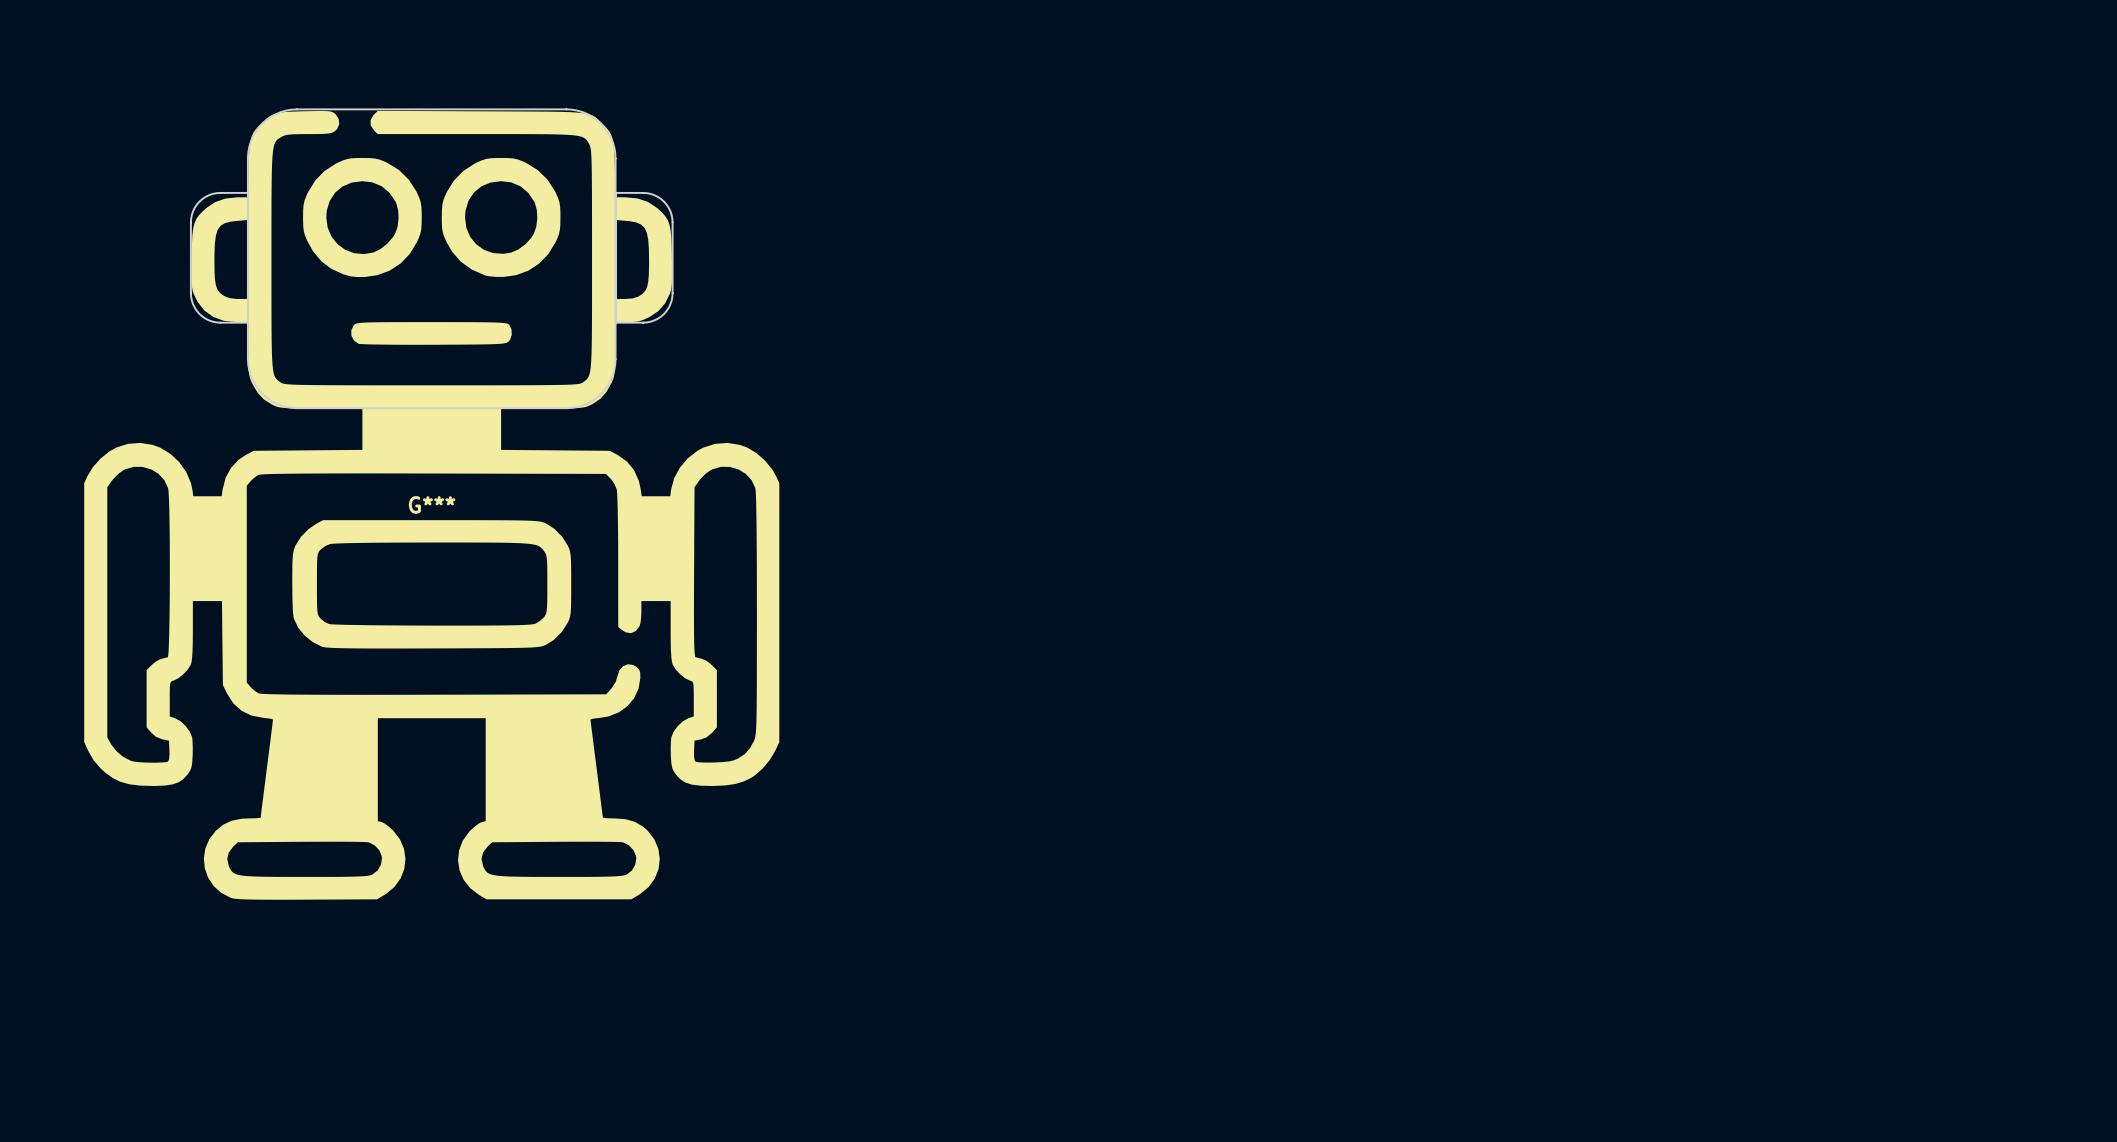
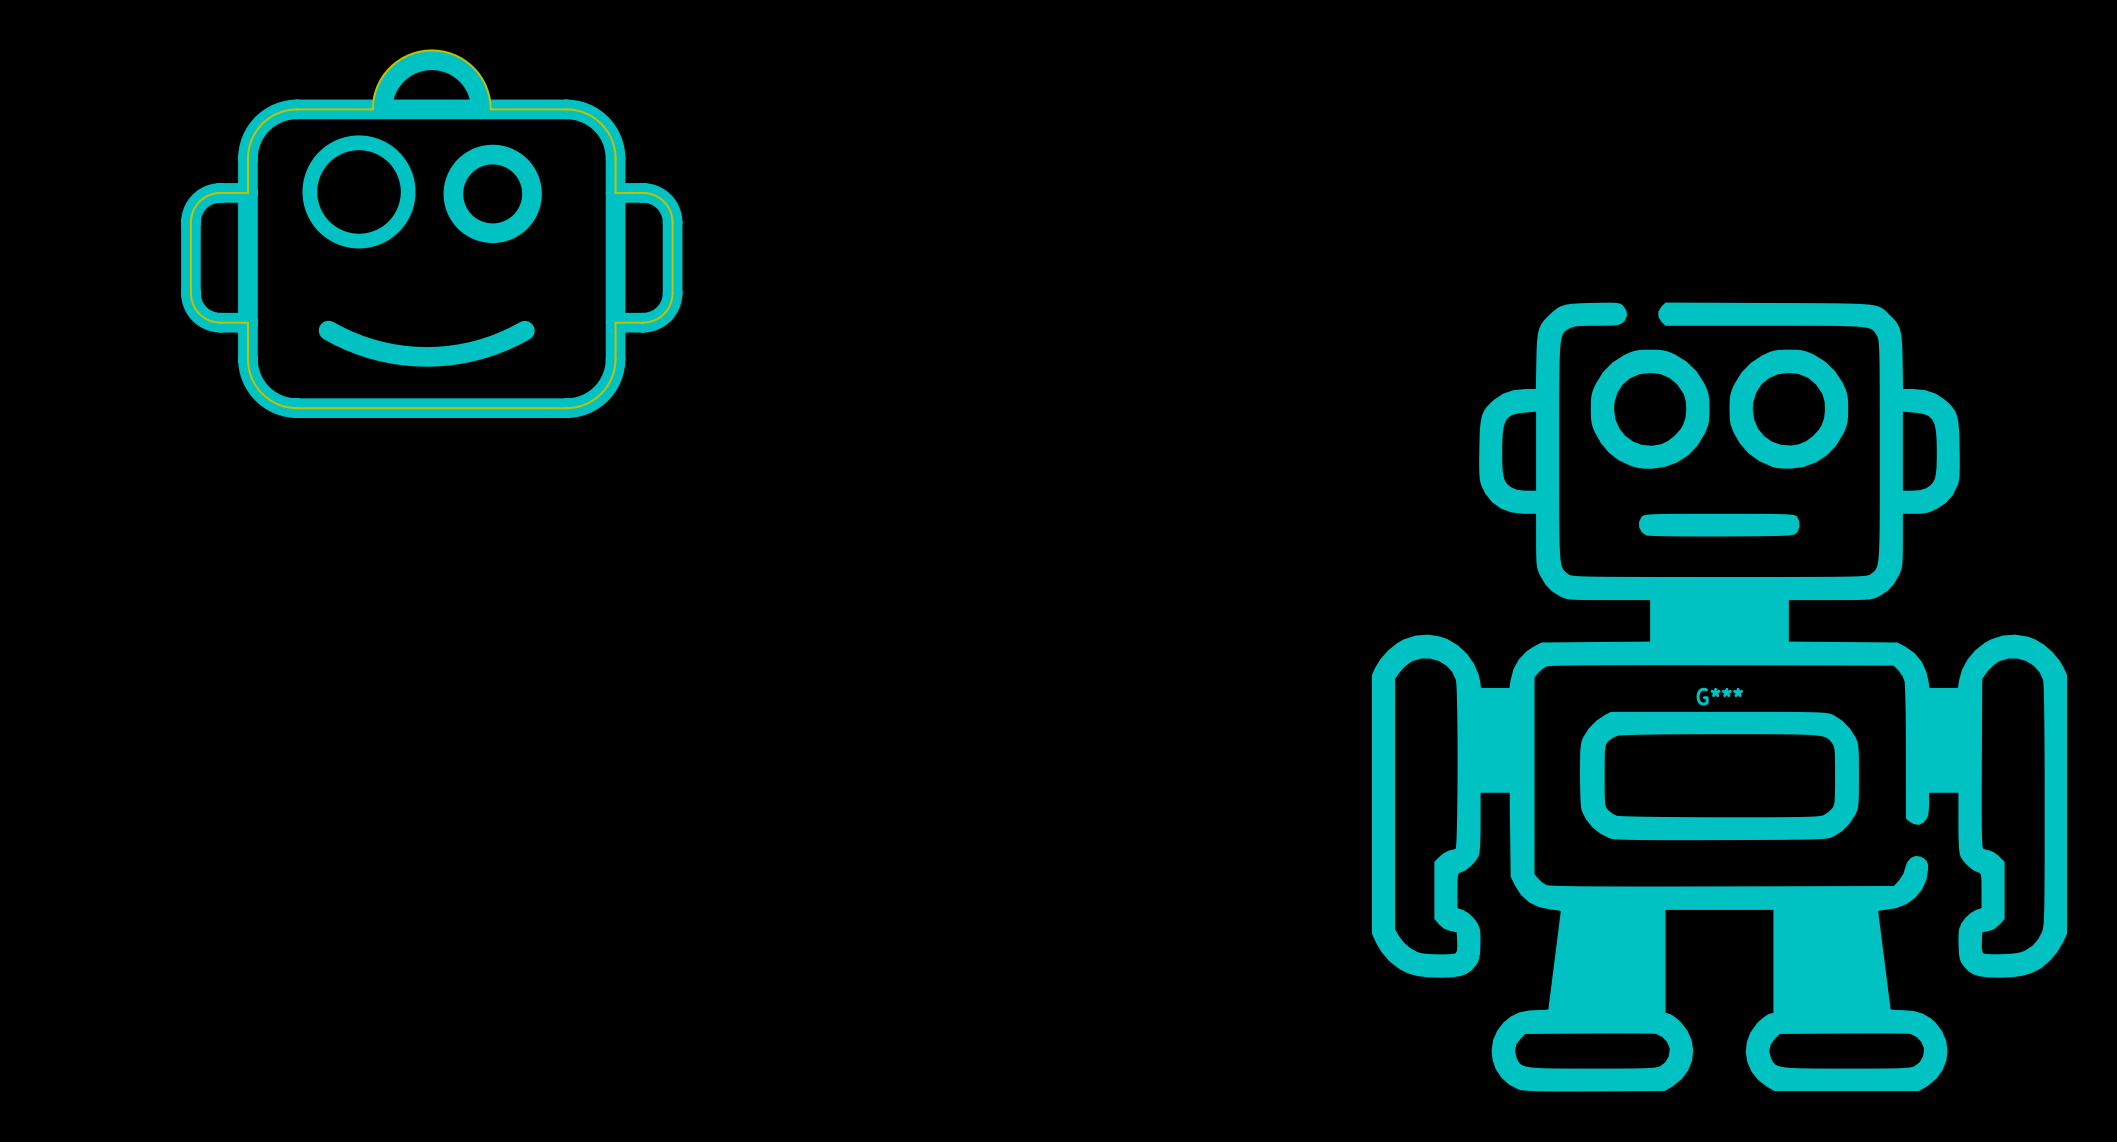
line: none -> (382, 108) (385, 92) (397, 74) (416, 62) (432, 60) (448, 63) (466, 74) (476, 88) (480, 109)
line: none -> (297, 109) (566, 109) (587, 114) (601, 123) (610, 137) (615, 153) (615, 359) (610, 380) (601, 393) (587, 403) (566, 408) (297, 408) (275, 403) (262, 393) (252, 380) (248, 364) (248, 153) (252, 137) (266, 120) (280, 112) (297, 109)
board edge: (372, 109) (490, 109) -> (372, 109) (375, 91) (387, 69) (407, 55) (431, 50) (449, 53) (471, 65) (485, 85) (490, 109)
drawing: none -> [302, 135, 416, 249]
drawing: none -> [443, 144, 542, 244]
line: none -> (247, 192) (216, 193) (205, 196) (194, 207) (190, 222) (190, 293) (194, 307) (202, 316) (212, 321) (247, 322)
board edge: (615, 192) (615, 322) -> none
line: none -> (615, 192) (646, 193) (657, 196) (668, 207) (672, 222) (672, 293) (668, 307) (661, 316) (650, 321) (615, 322)
line: none -> (328, 330) (370, 348) (392, 353) (426, 356) (460, 353) (483, 348) (524, 330)
G***: (431, 505) -> none
G***: none -> (1719, 696)

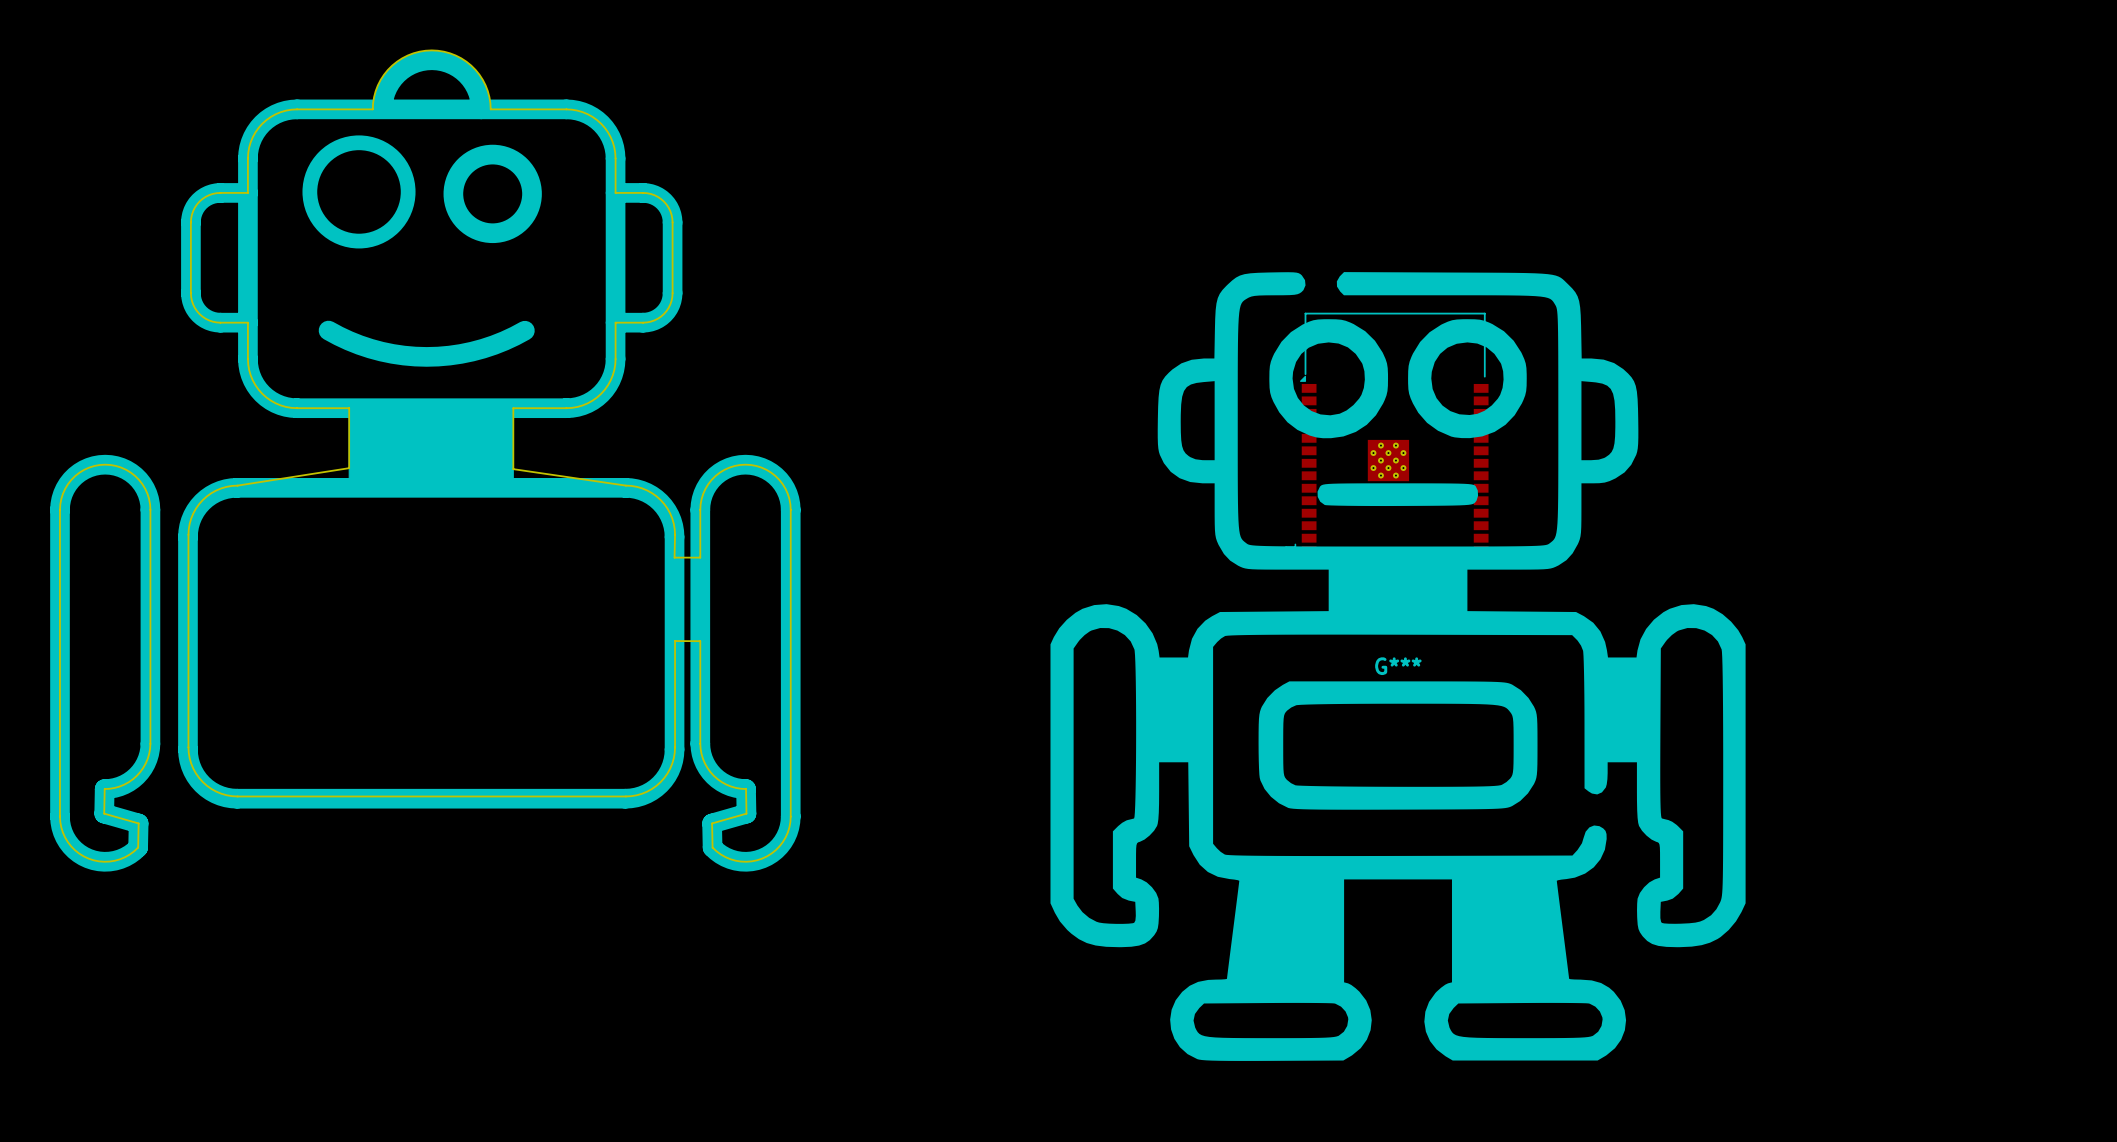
drawing: none -> [348, 407, 514, 490]
board edge: (349, 408) (513, 408) -> (349, 408) (349, 468) (221, 488) (202, 500) (191, 518) (188, 534) (188, 747) (193, 768) (202, 782) (216, 791) (237, 796) (636, 795) (652, 788) (660, 782) (667, 773) (673, 758) (675, 641) (700, 641) (700, 743) (702, 758) (707, 767) (717, 779) (731, 786) (746, 789) (746, 813) (712, 823) (712, 847) (720, 854) (735, 860) (751, 861) (767, 856) (782, 841) (789, 827) (790, 816) (790, 509) (785, 488) (771, 472) (756, 465) (740, 464) (719, 472) (708, 484) (701, 499) (700, 557) (674, 557) (674, 529) (672, 518) (660, 500) (647, 490) (631, 485) (513, 469) (513, 408)
part: none -> (1394, 441)
line: none -> (237, 487) (625, 487) (636, 489) (651, 495) (663, 506) (669, 515) (674, 536) (674, 749) (673, 760) (667, 775) (651, 791) (641, 795) (625, 798) (237, 798) (226, 797) (210, 791) (195, 775) (188, 755) (188, 531) (192, 515) (202, 502) (215, 492) (237, 487)
line: none -> (59, 509) (60, 821) (65, 837) (79, 853) (93, 860) (109, 861) (125, 857) (138, 847) (138, 823) (104, 813) (104, 789) (119, 786) (133, 779) (143, 767) (150, 748) (150, 504) (145, 488) (135, 476) (121, 467) (99, 464) (84, 469) (71, 479) (62, 493) (59, 509)
board edge: none -> (59, 509) (60, 821) (65, 837) (79, 853) (93, 860) (109, 861) (125, 857) (138, 847) (138, 823) (104, 813) (104, 789) (119, 786) (136, 775) (145, 763) (150, 748) (150, 504) (145, 488) (135, 476) (121, 467) (99, 464) (84, 469) (71, 479) (62, 493) (59, 509)
line: none -> (700, 509) (700, 748) (704, 763) (717, 779) (731, 786) (746, 789) (746, 813) (712, 823) (712, 847) (730, 859) (751, 861) (762, 858) (775, 850) (785, 837) (790, 821) (790, 504) (782, 484) (771, 472) (756, 465) (740, 464) (724, 469) (711, 479) (703, 493) (700, 509)
G***: none -> (1398, 666)
G***: (1719, 696) -> none

